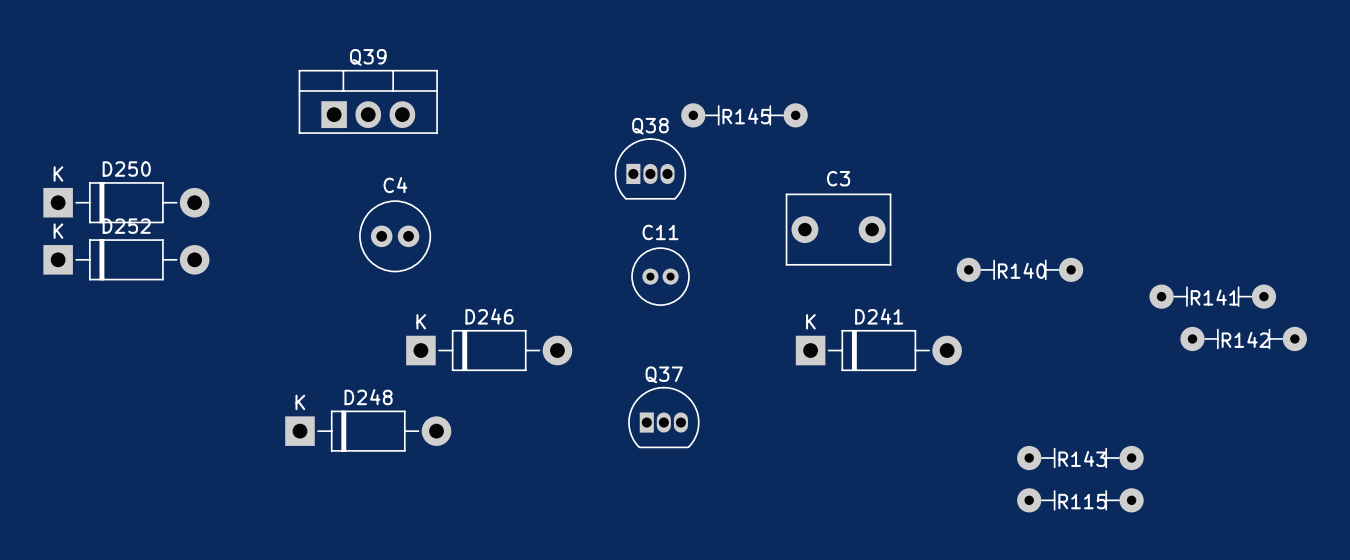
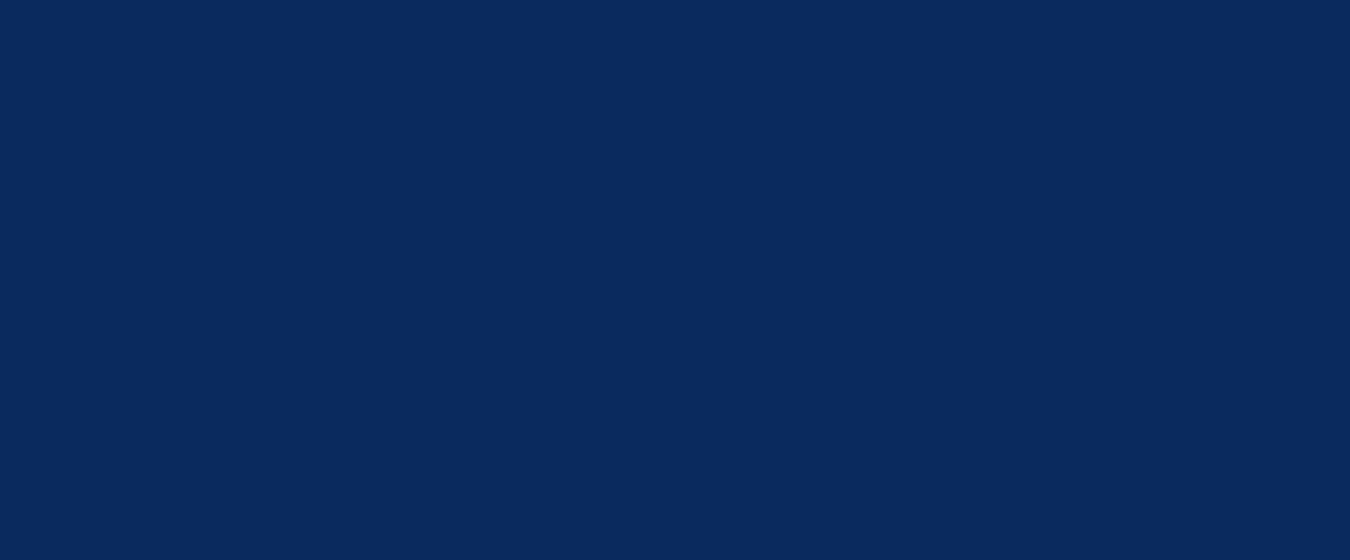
Q39: (368, 101) -> none
R145: (744, 115) -> none
Q38: (650, 168) -> none
D250: (126, 202) -> none
C3: (838, 229) -> none
C4: (395, 236) -> none
D252: (126, 259) -> none
R140: (1019, 269) -> none
C11: (660, 276) -> none
R141: (1212, 296) -> none
R142: (1243, 338) -> none
D246: (489, 350) -> none
D241: (878, 350) -> none
Q37: (663, 417) -> none
D248: (368, 431) -> none
R143: (1080, 458) -> none
R115: (1080, 500) -> none

